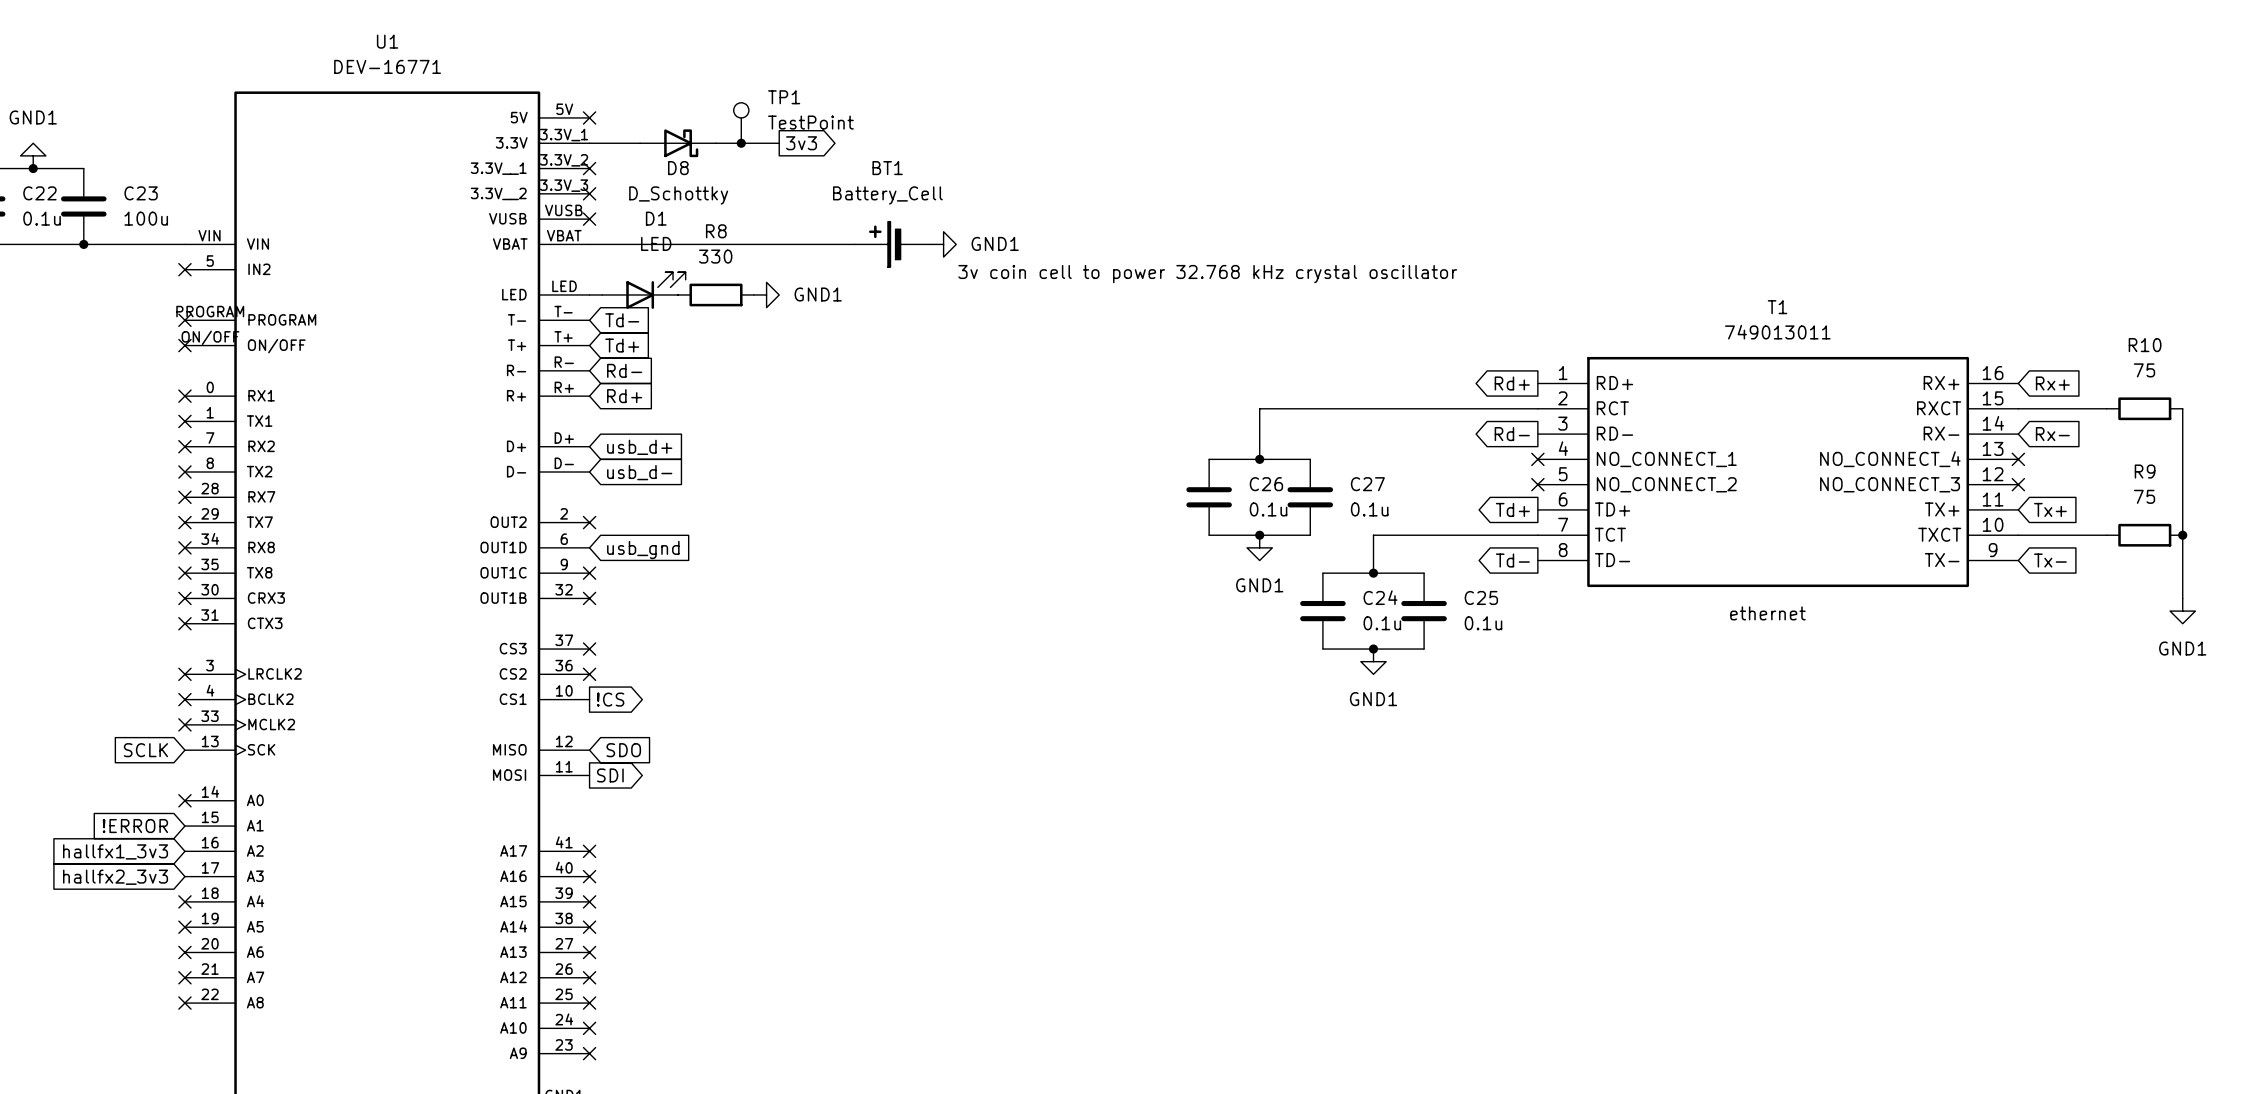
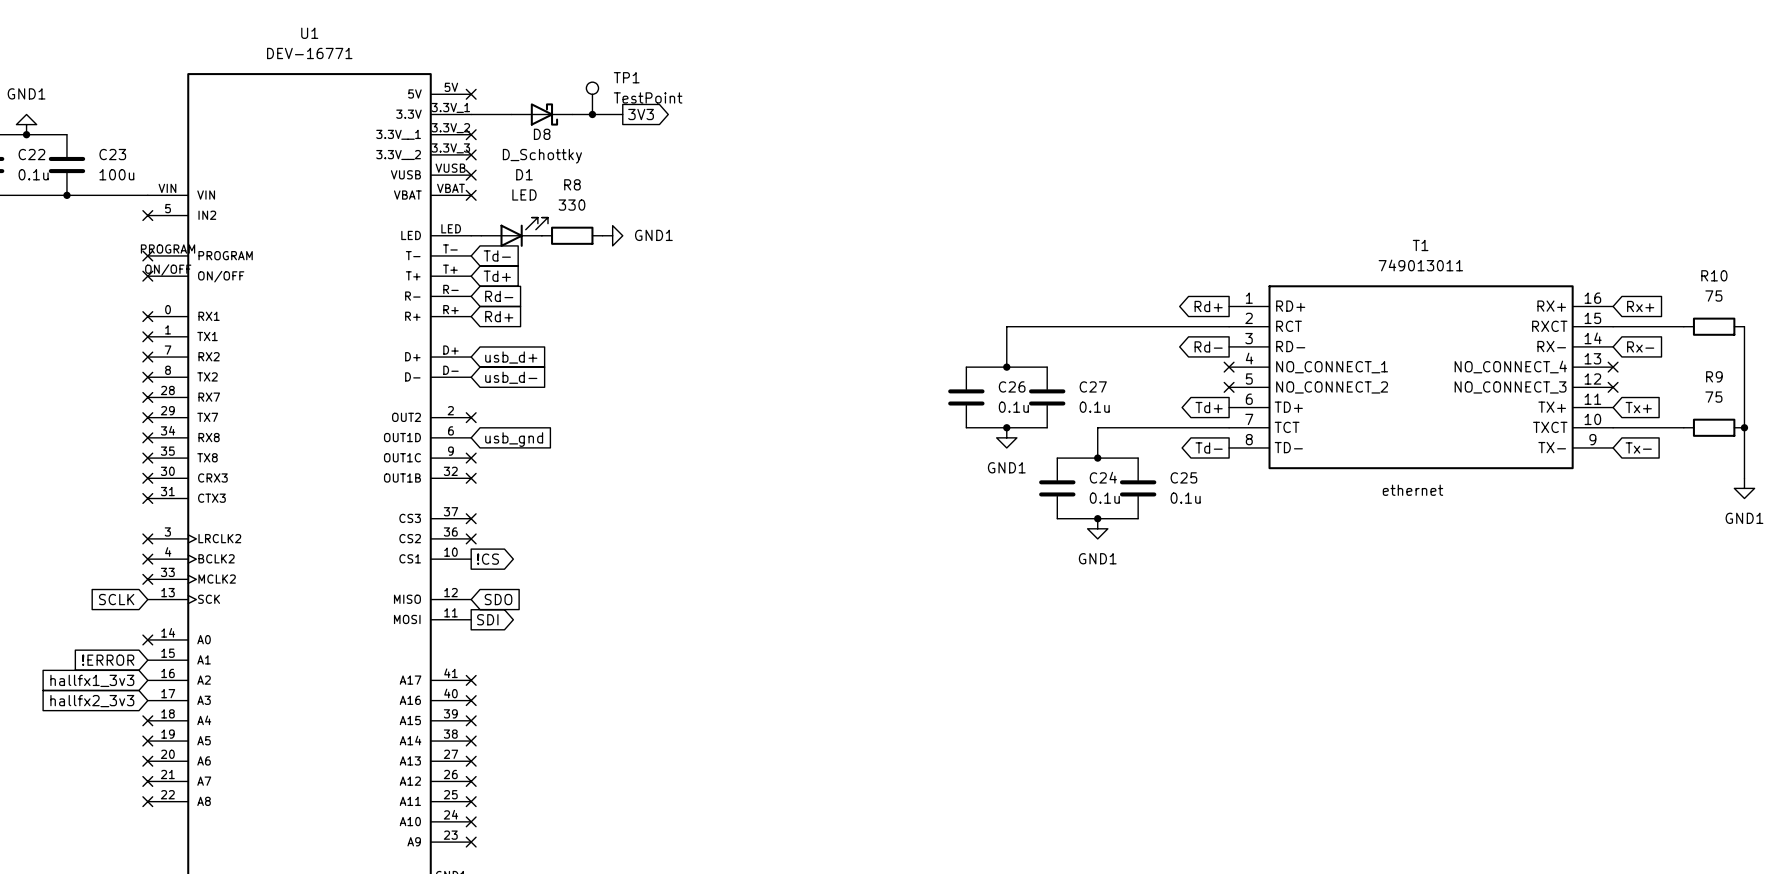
global label: 3v3 (801, 143) -> 3V3 (641, 114)
wire: (589, 244) (855, 244) -> none
no-connect mark: none -> (471, 195)
BT1: Battery_Cell (893, 244) -> none
power symbol: GND1 (943, 244) -> none
text: 3v coin cell to power 32.768 kHz crystal oscillator (1207, 274) -> none

